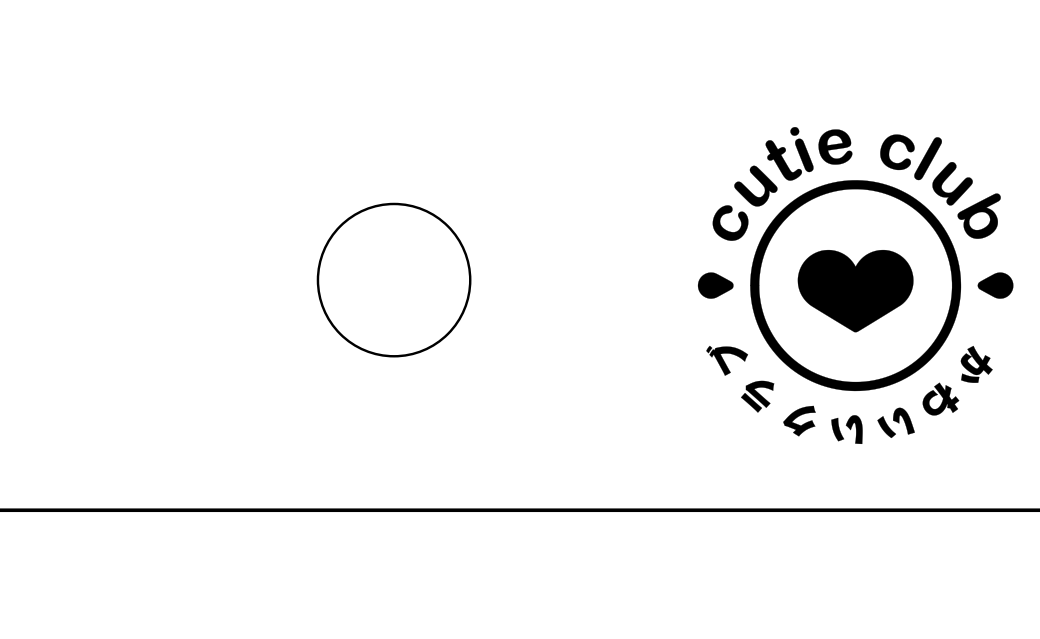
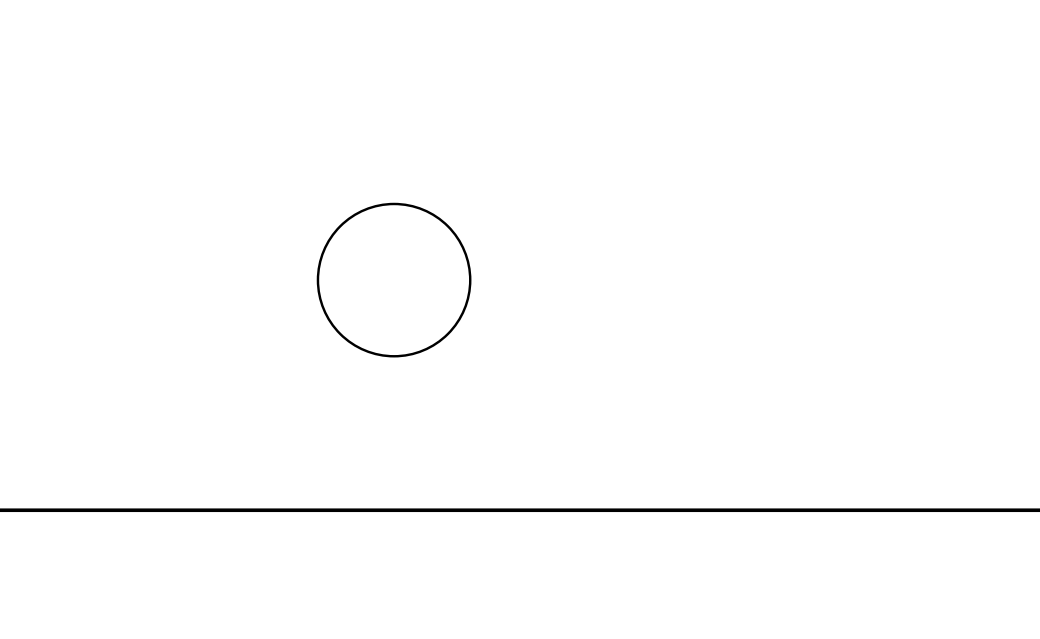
drawing: [697, 127, 1014, 445] -> none

